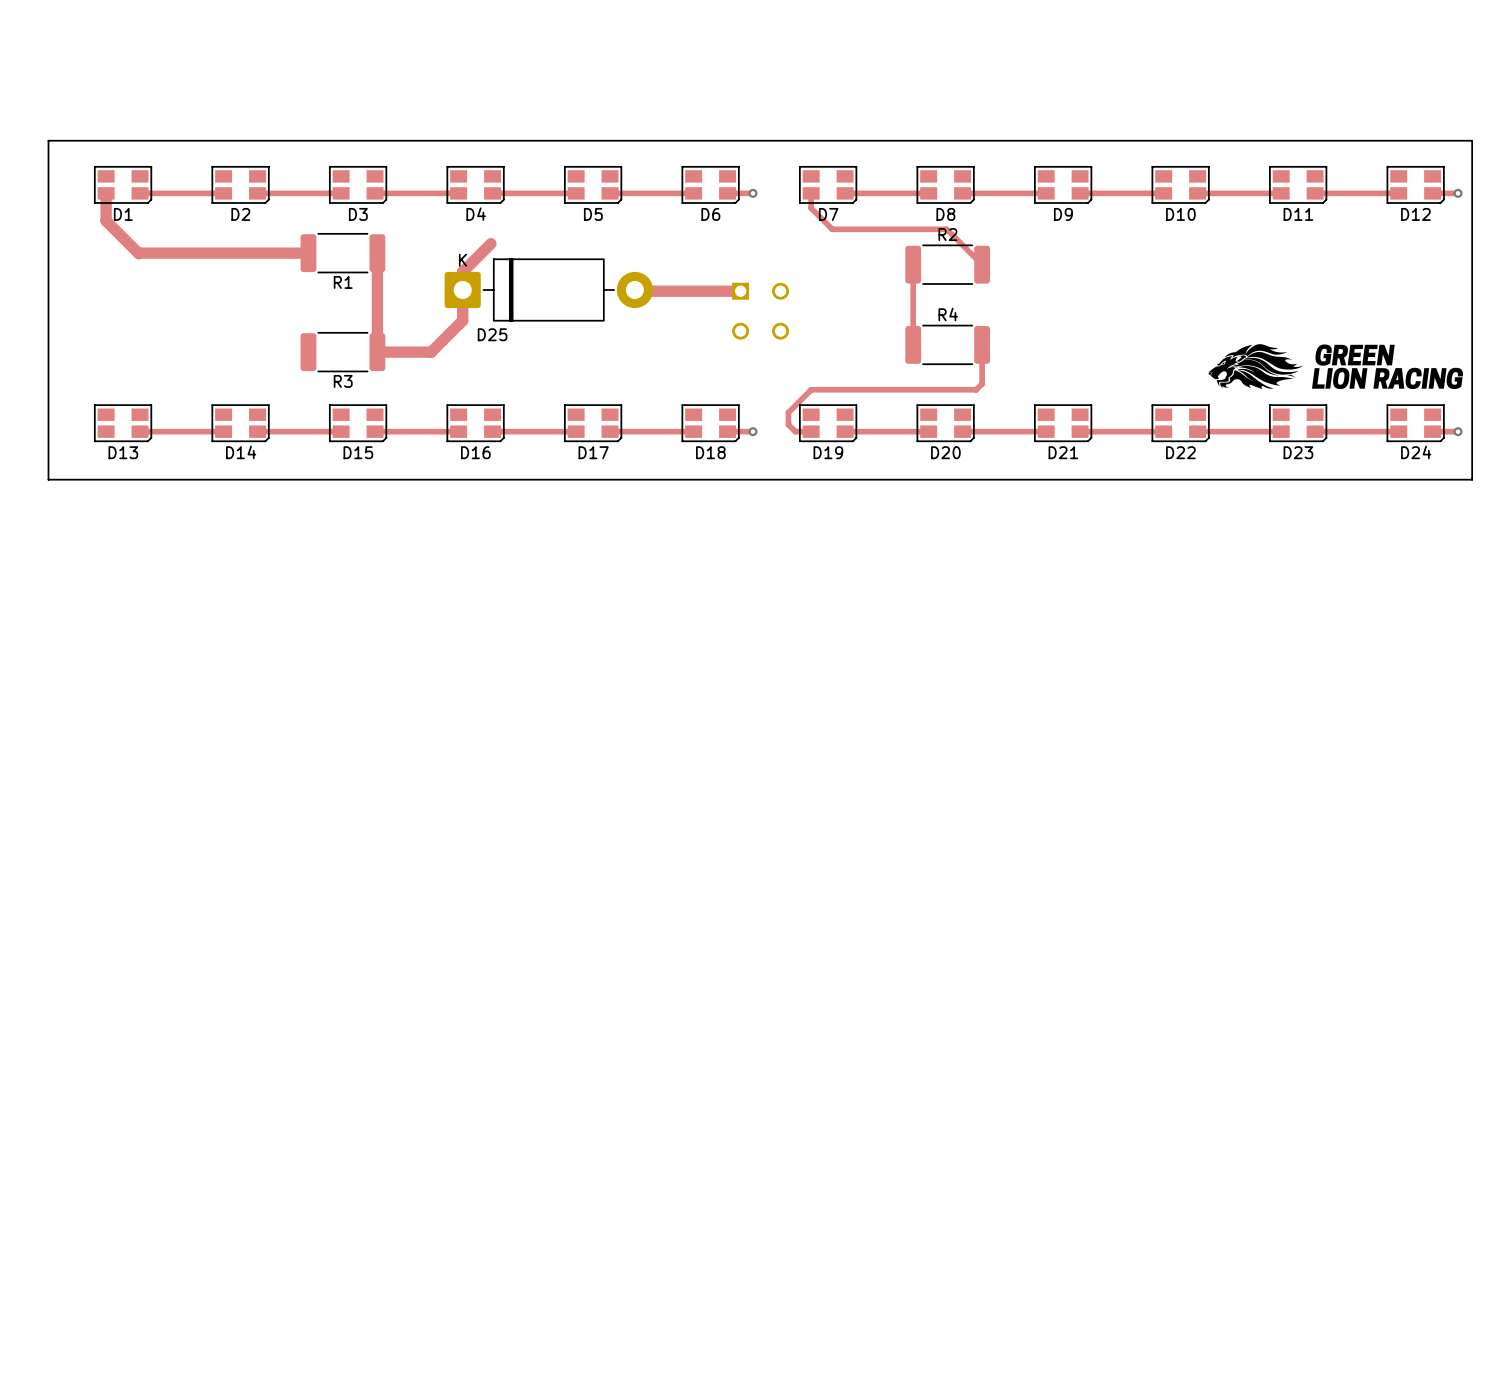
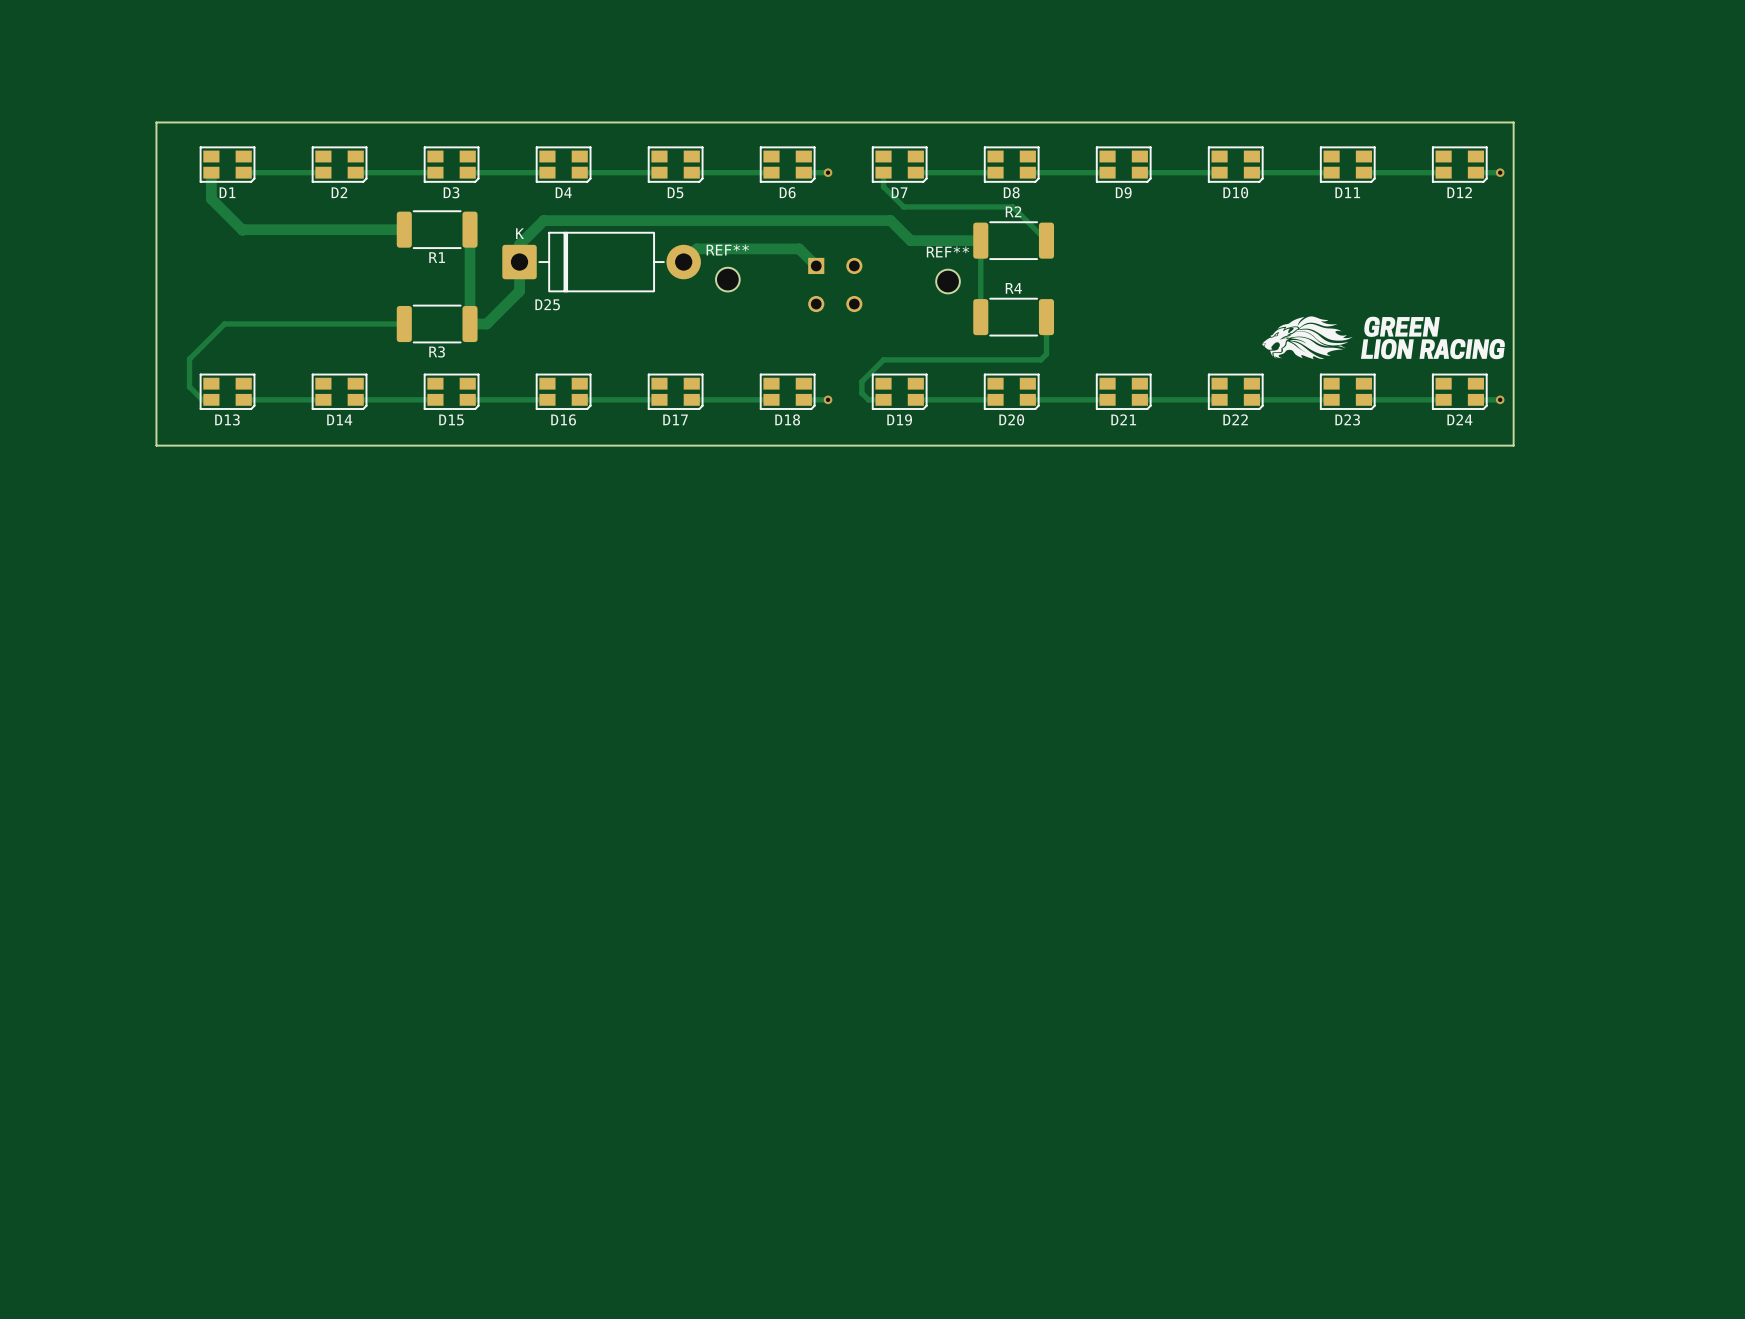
track: (490, 243) (462, 271) (462, 320) (431, 352) (394, 352) -> (980, 240) (910, 240) (890, 220) (543, 220) (519, 244) (519, 291) (486, 324)
D25 position: (548, 289) -> (601, 262)
track: (634, 289) (740, 291) -> (684, 263) (683, 262) (696, 248) (799, 248) (816, 265)
REF**: none -> (727, 279)
REF**: none -> (948, 281)
track: none -> (404, 324) (224, 324) (189, 359) (189, 386) (202, 399) (211, 399)

